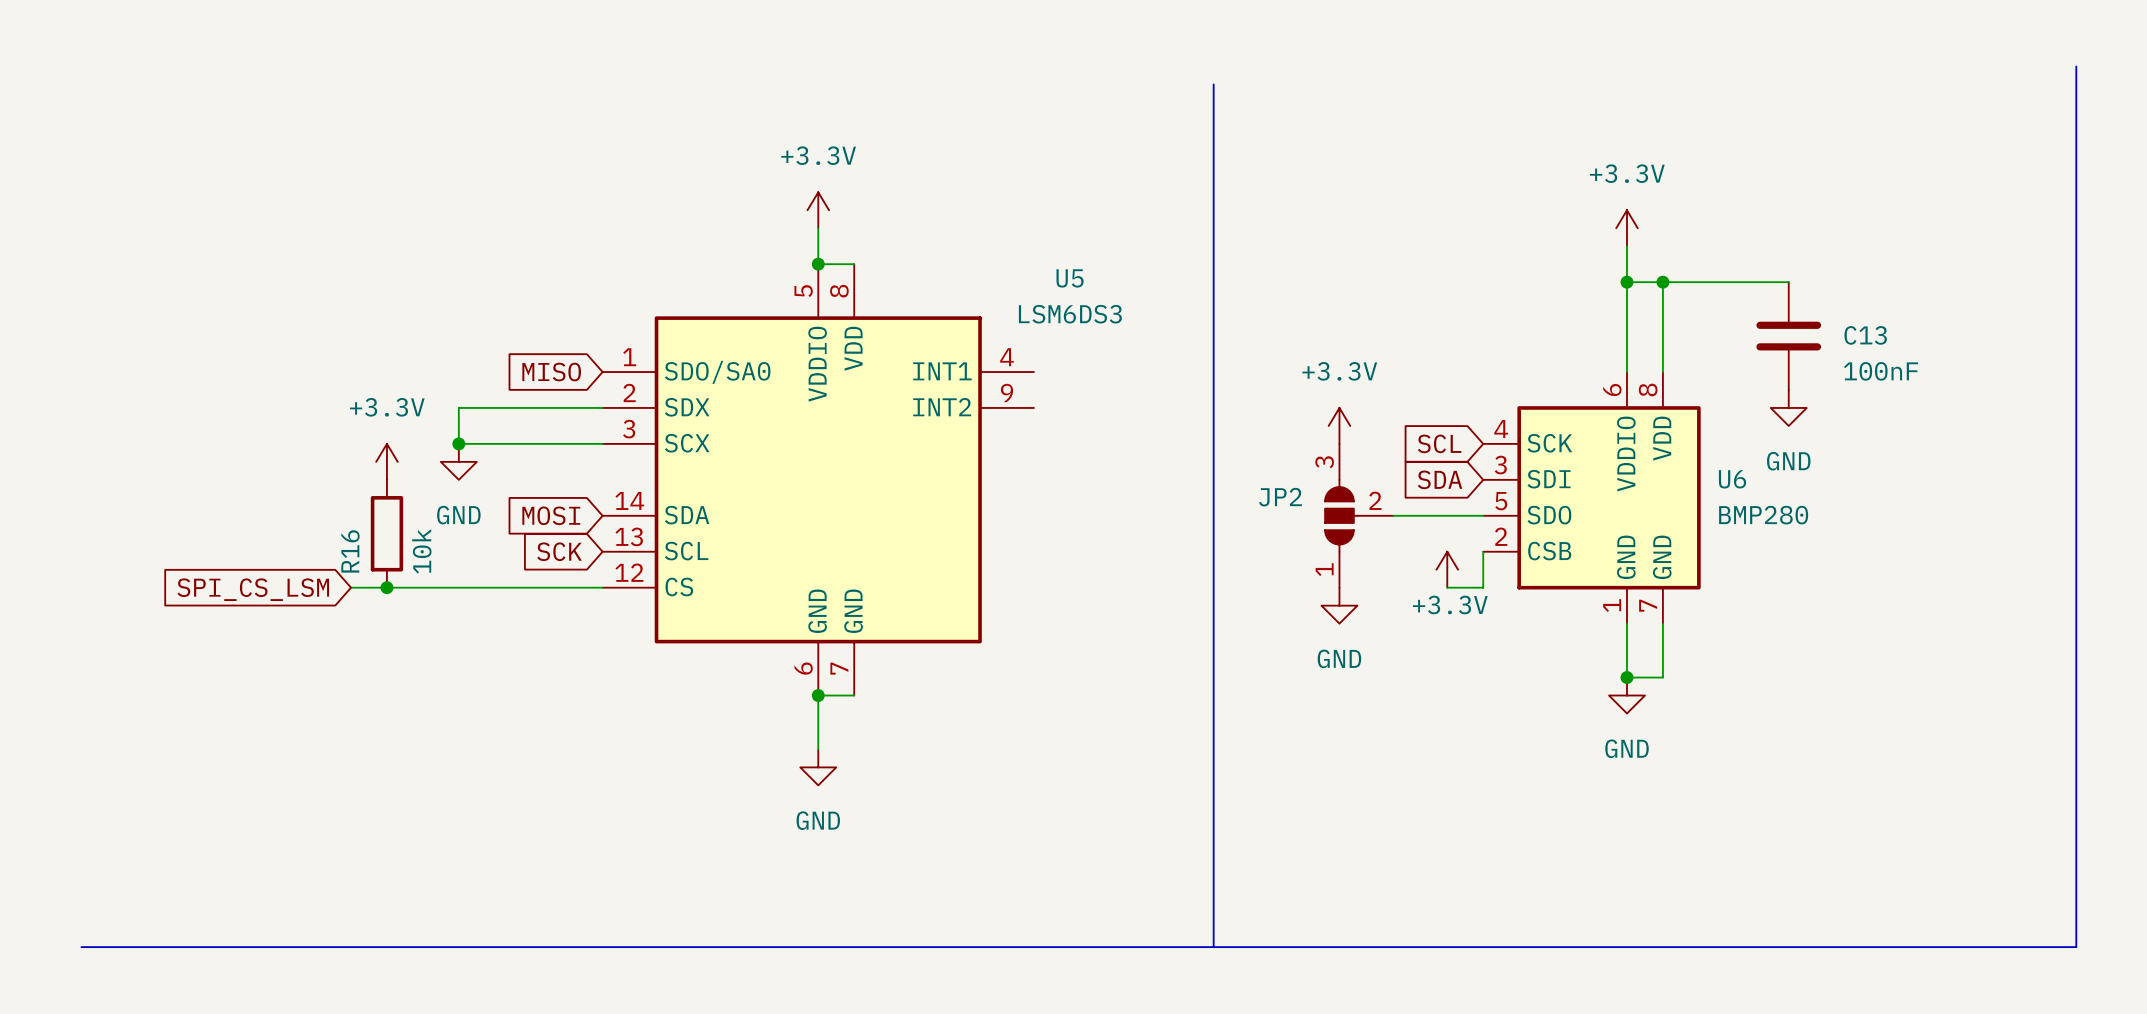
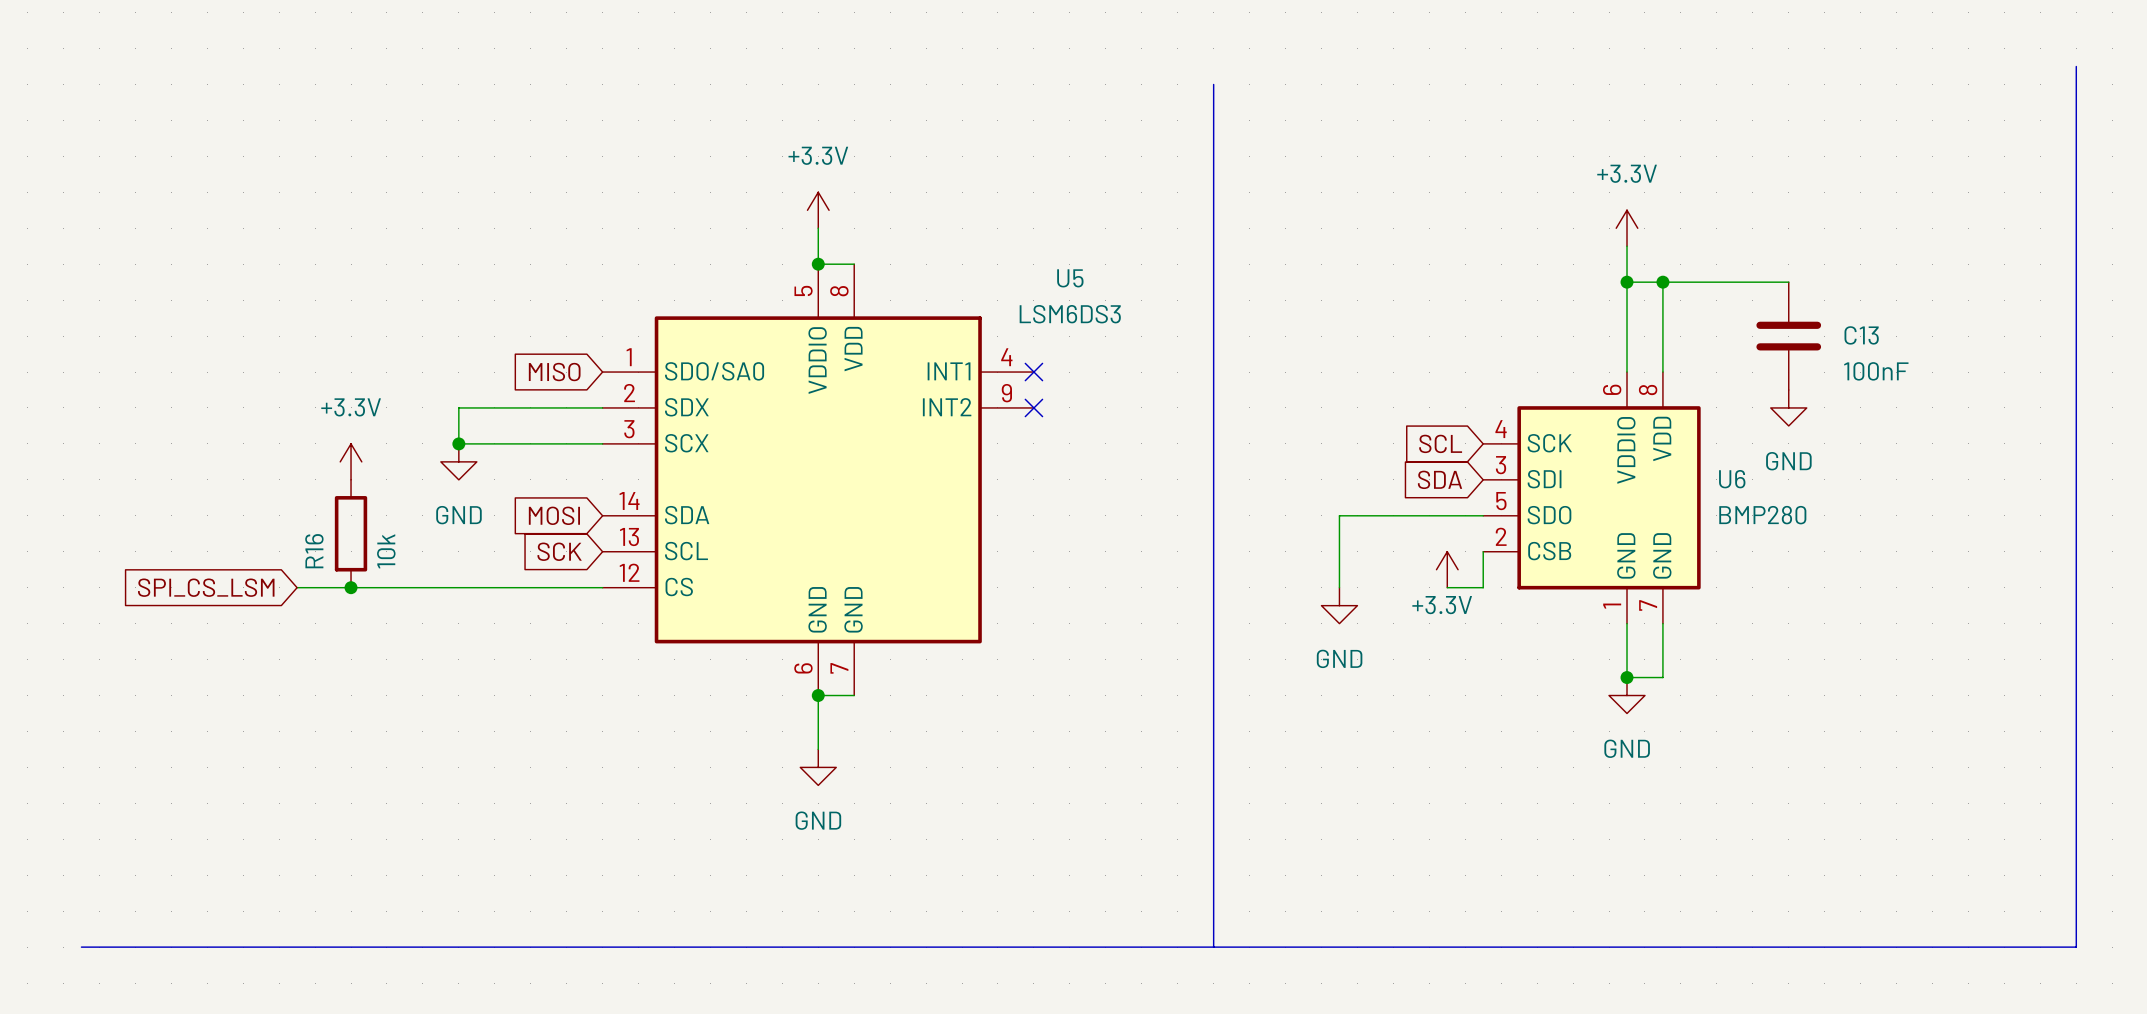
no-connect mark: none -> (1033, 372)
no-connect mark: none -> (1033, 407)
power symbol: +3.3V (1339, 425) -> none
power symbol position: +3.3V (386, 461) -> +3.3V (351, 461)
JP2: (1359, 515) -> none
R16 position: (386, 533) -> (351, 533)
wire: none -> (297, 587) (351, 587)
junction position: (386, 587) -> (351, 587)
global label position: SPI_CS_LSM (253, 589) -> SPI_CS_LSM (206, 587)

